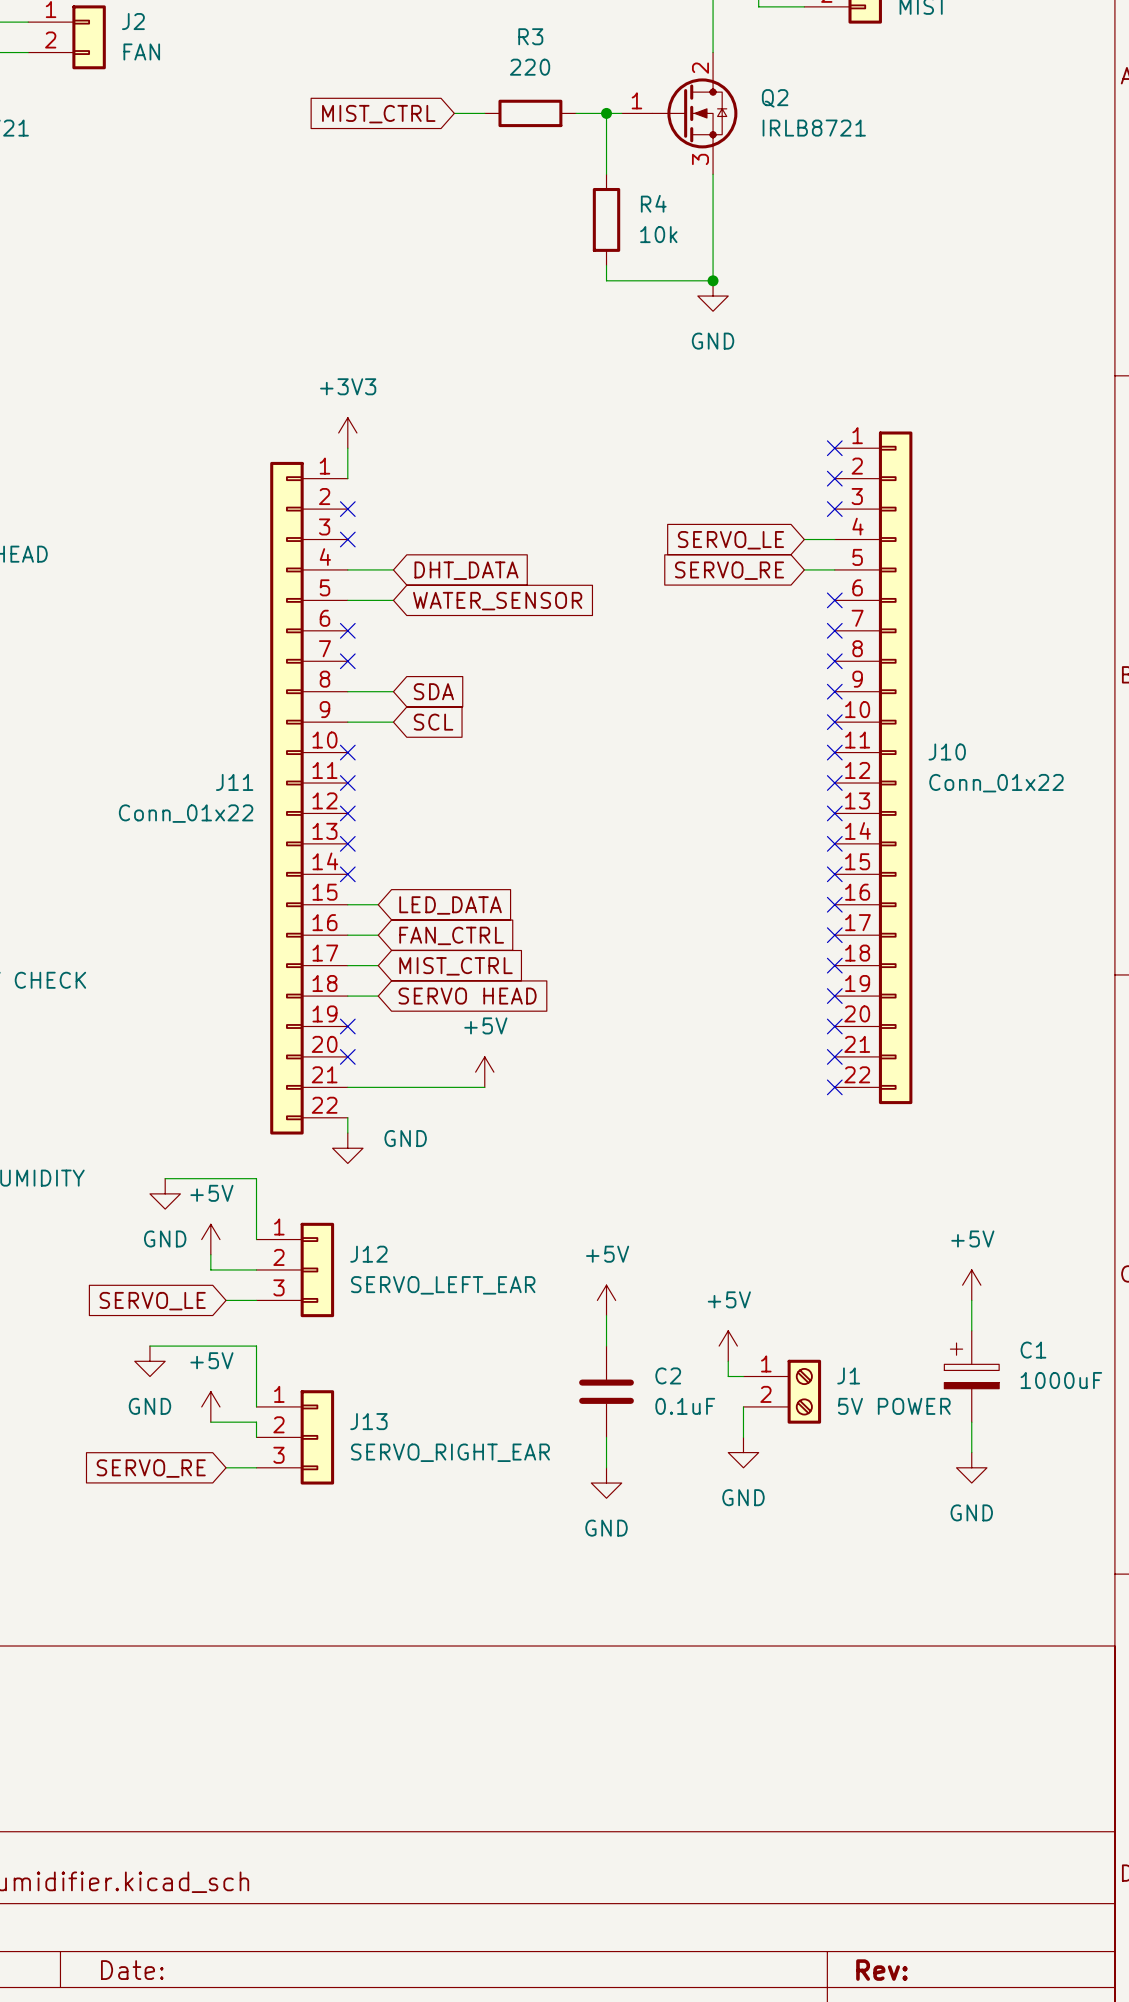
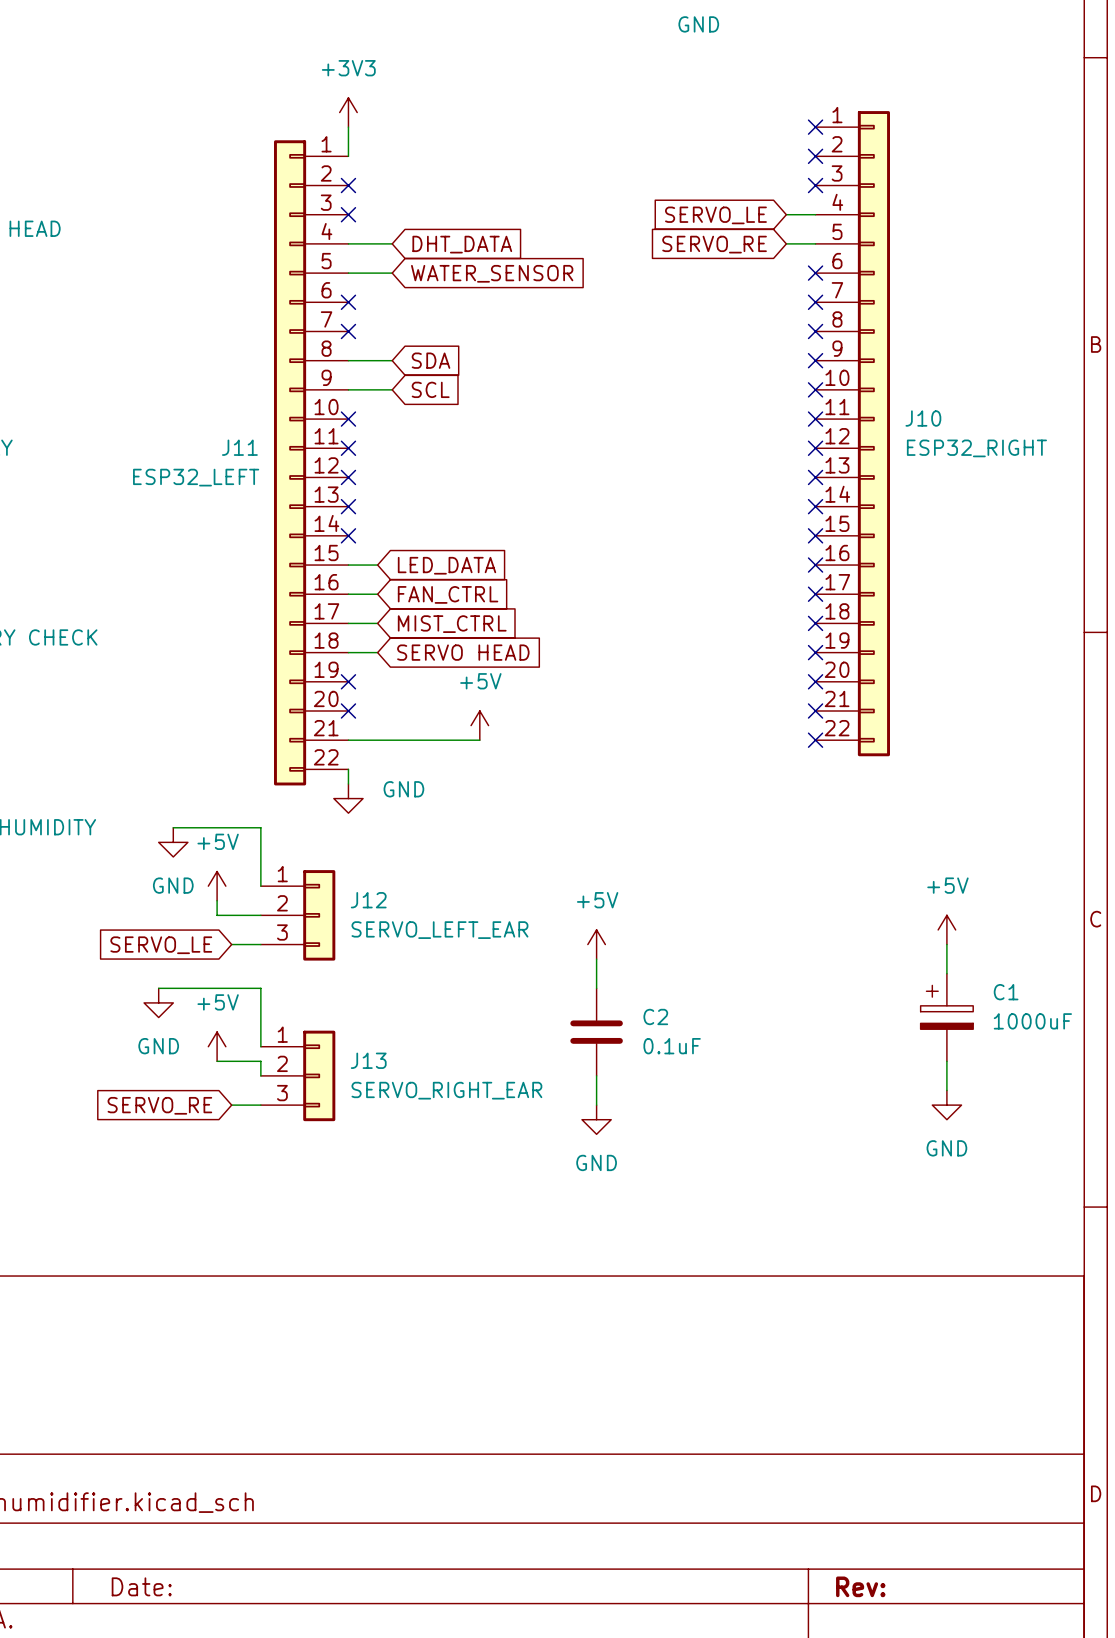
J10 value: Conn_01x22 (996, 783) -> ESP32_RIGHT (976, 448)
J11 value: Conn_01x22 (186, 813) -> ESP32_LEFT (196, 477)
power symbol: +5V (728, 1346) -> none
wire: (728, 1361) (728, 1376) (743, 1376) -> none
J1: 5V POWER (782, 1391) -> none
wire: (743, 1406) (743, 1437) -> none
power symbol: GND (743, 1452) -> none

